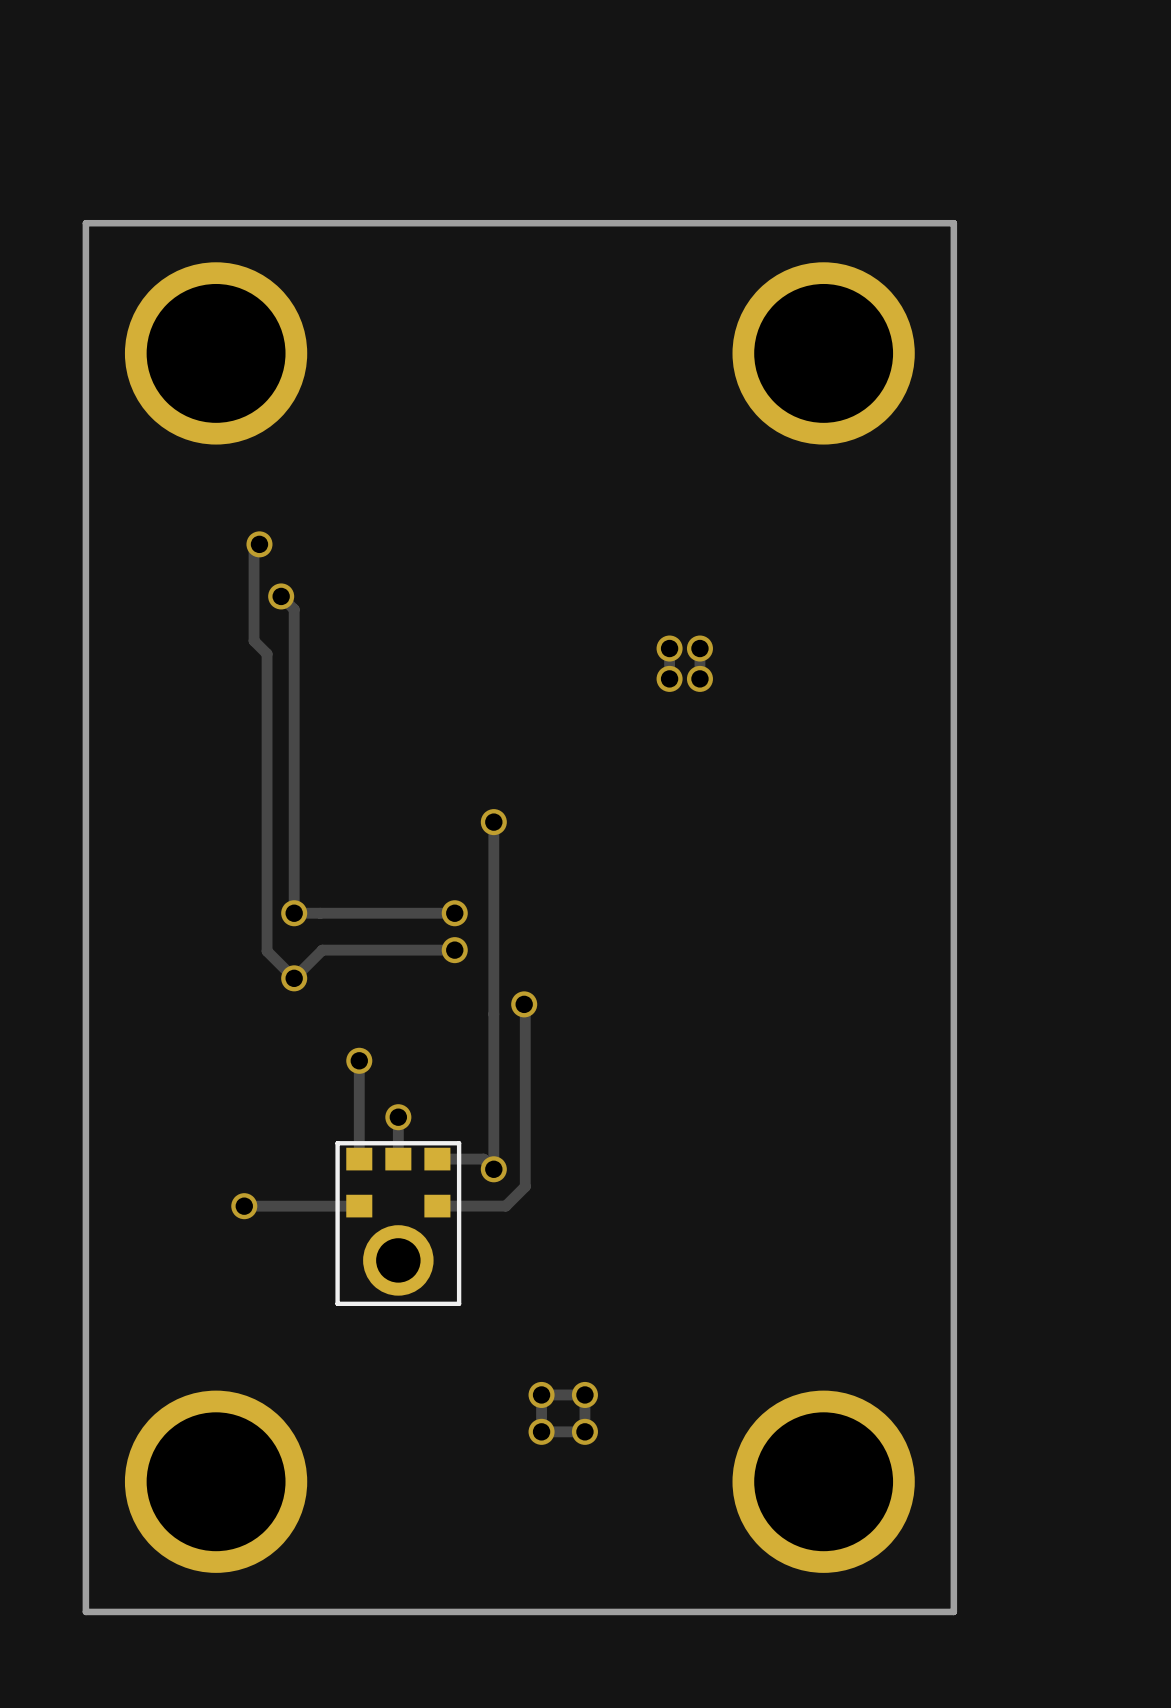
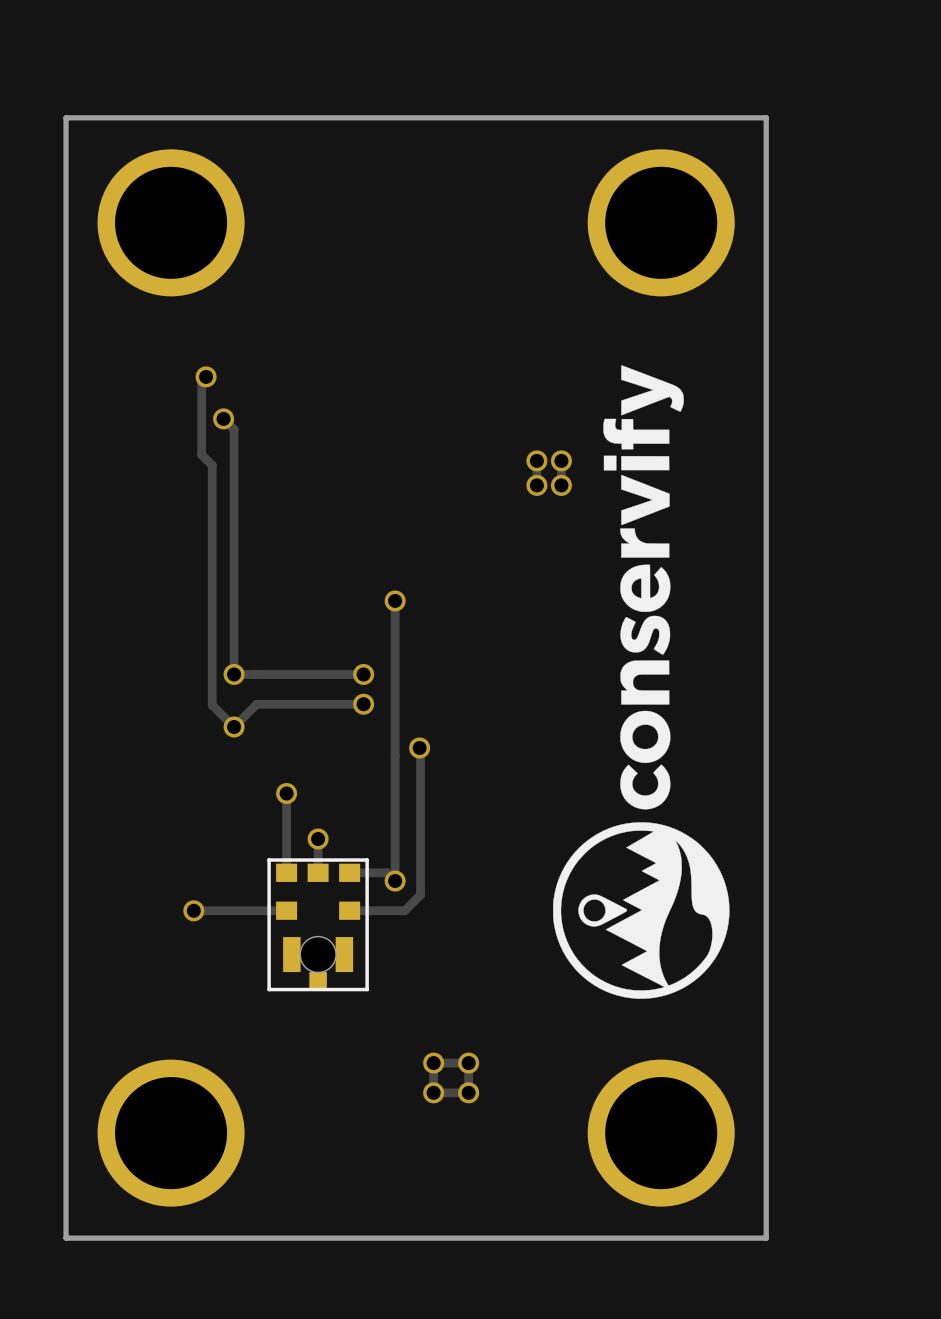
drawing: none -> [553, 365, 730, 999]
part footprint: [335, 1141, 462, 1306] -> [267, 858, 369, 992]

